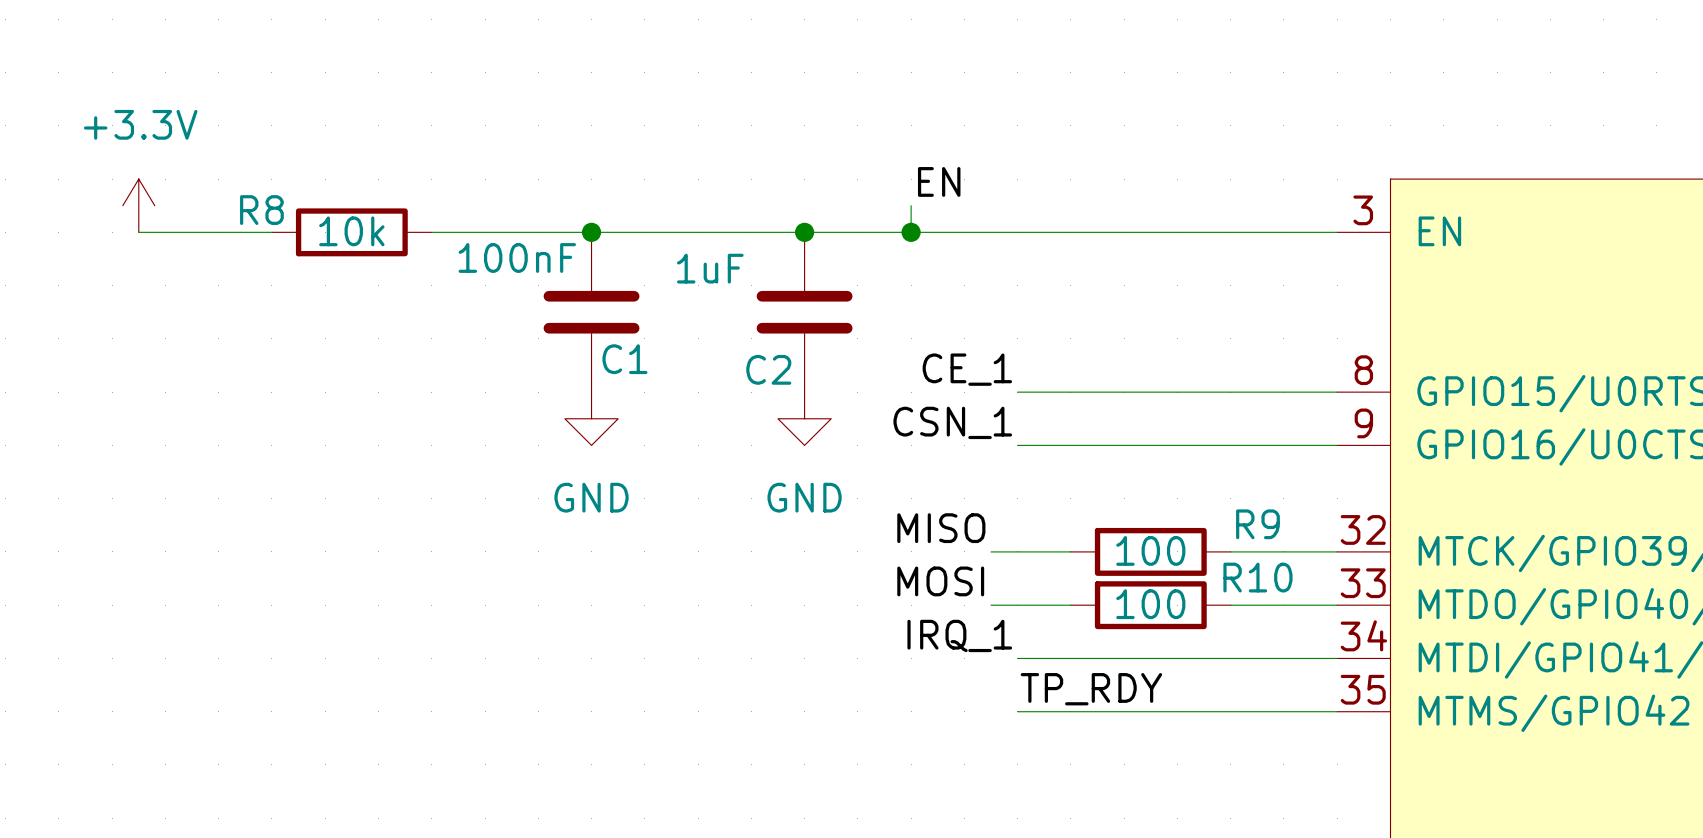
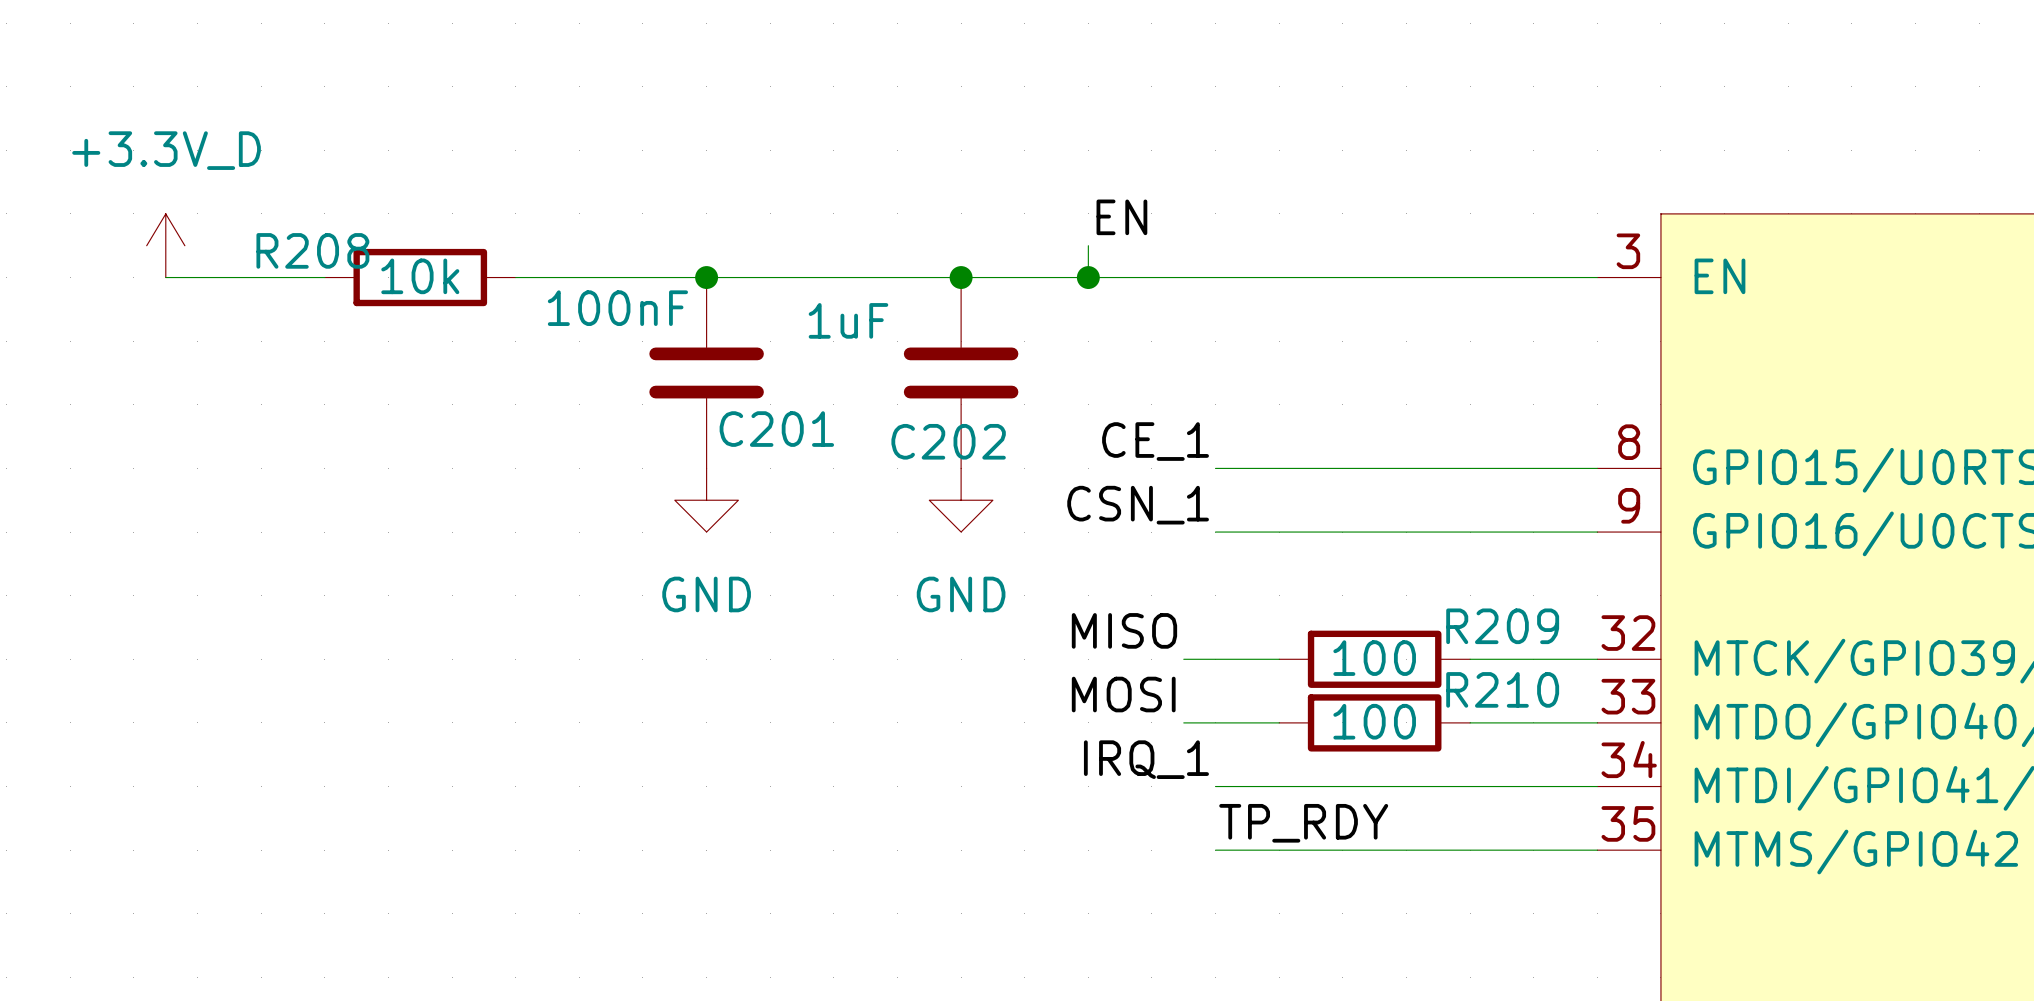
power symbol: +3.3V (138, 205) -> +3.3V_D (165, 245)
R8 name: R8 (261, 210) -> R208 (312, 250)
C1 name: C1 (624, 359) -> C201 (776, 429)
C2 name: C2 (768, 369) -> C202 (948, 441)
R9 name: R9 (1257, 524) -> R209 (1502, 626)
R10 name: R10 (1257, 577) -> R210 (1502, 689)

